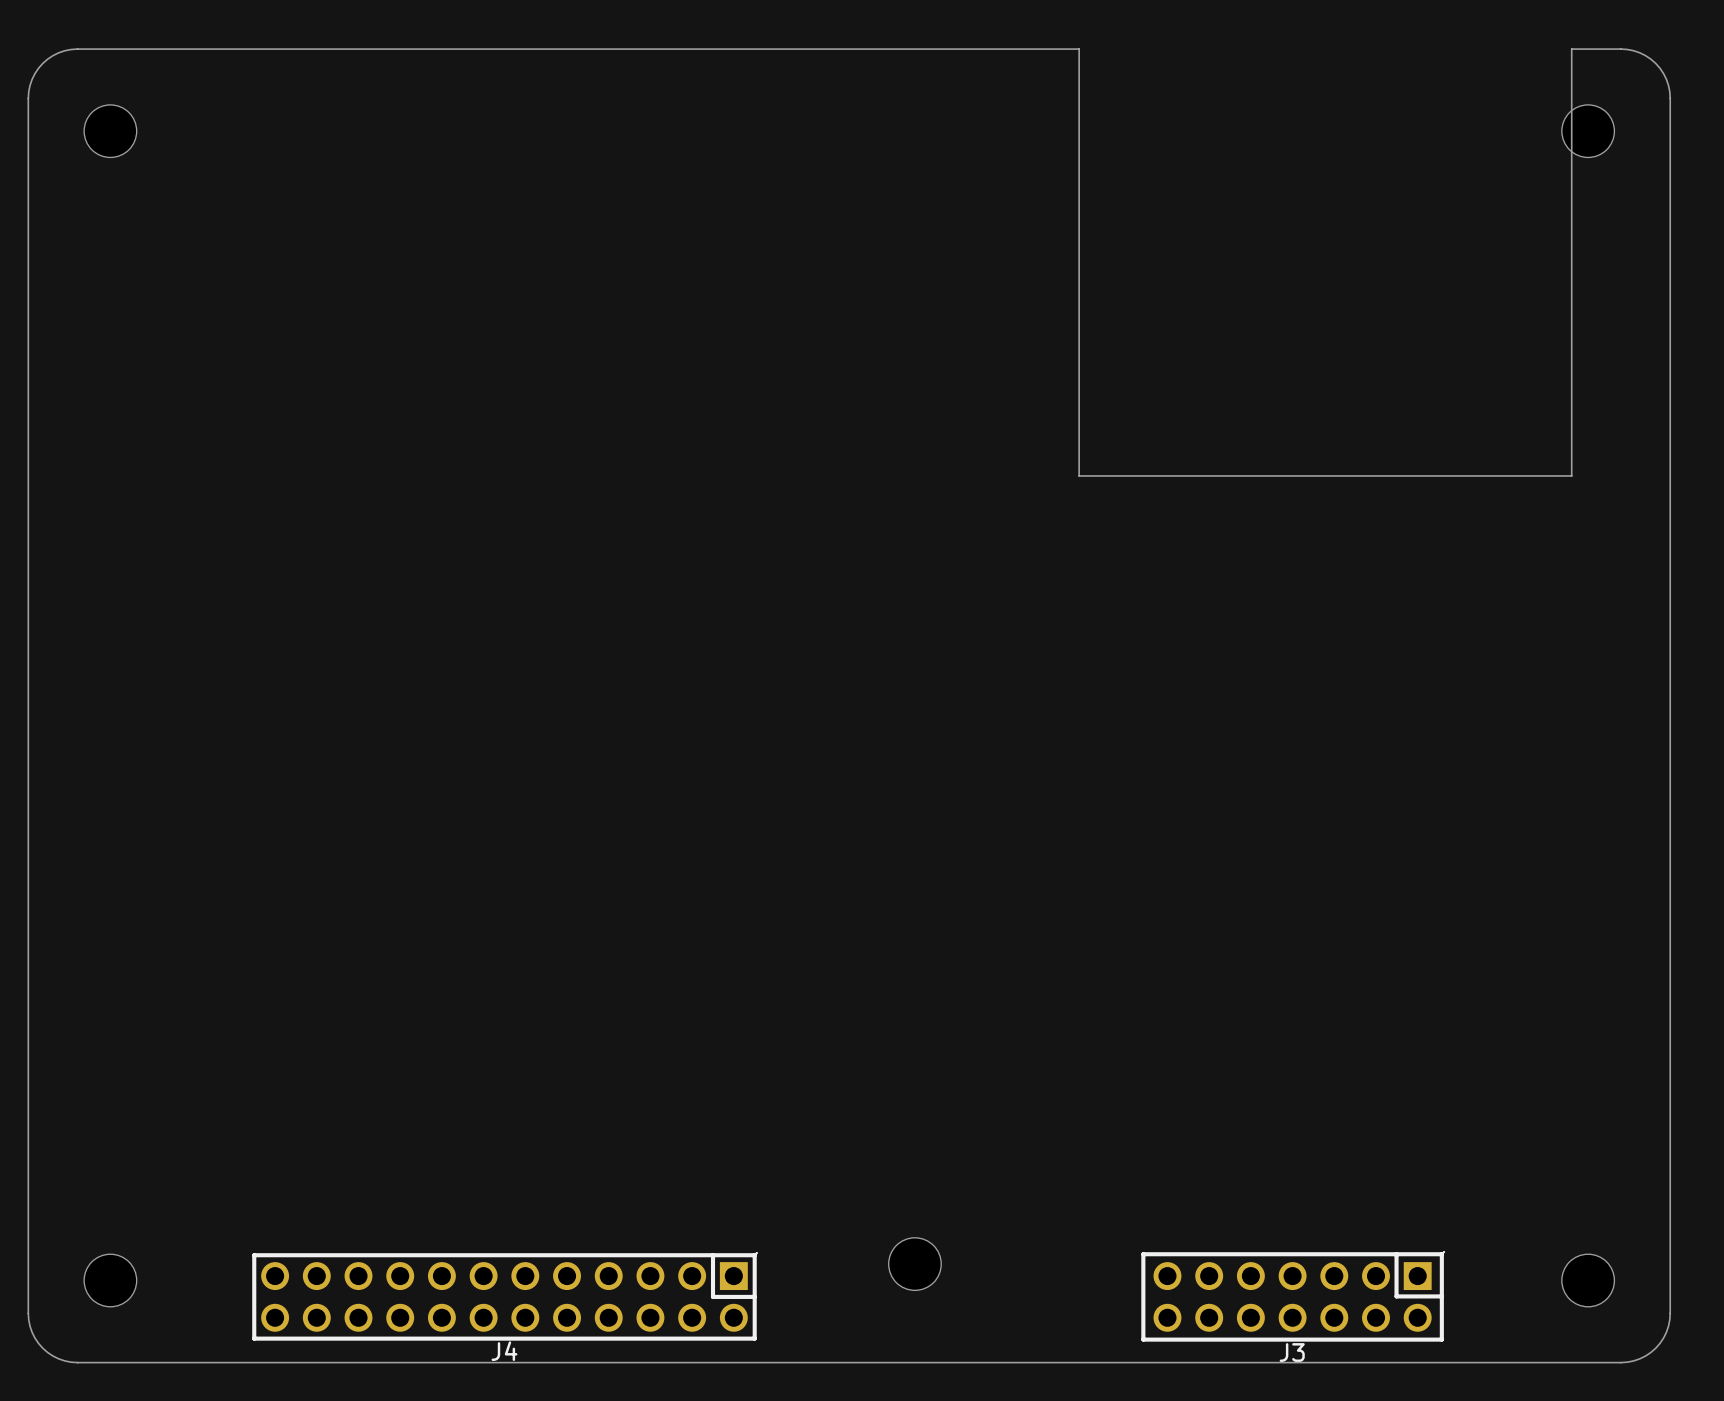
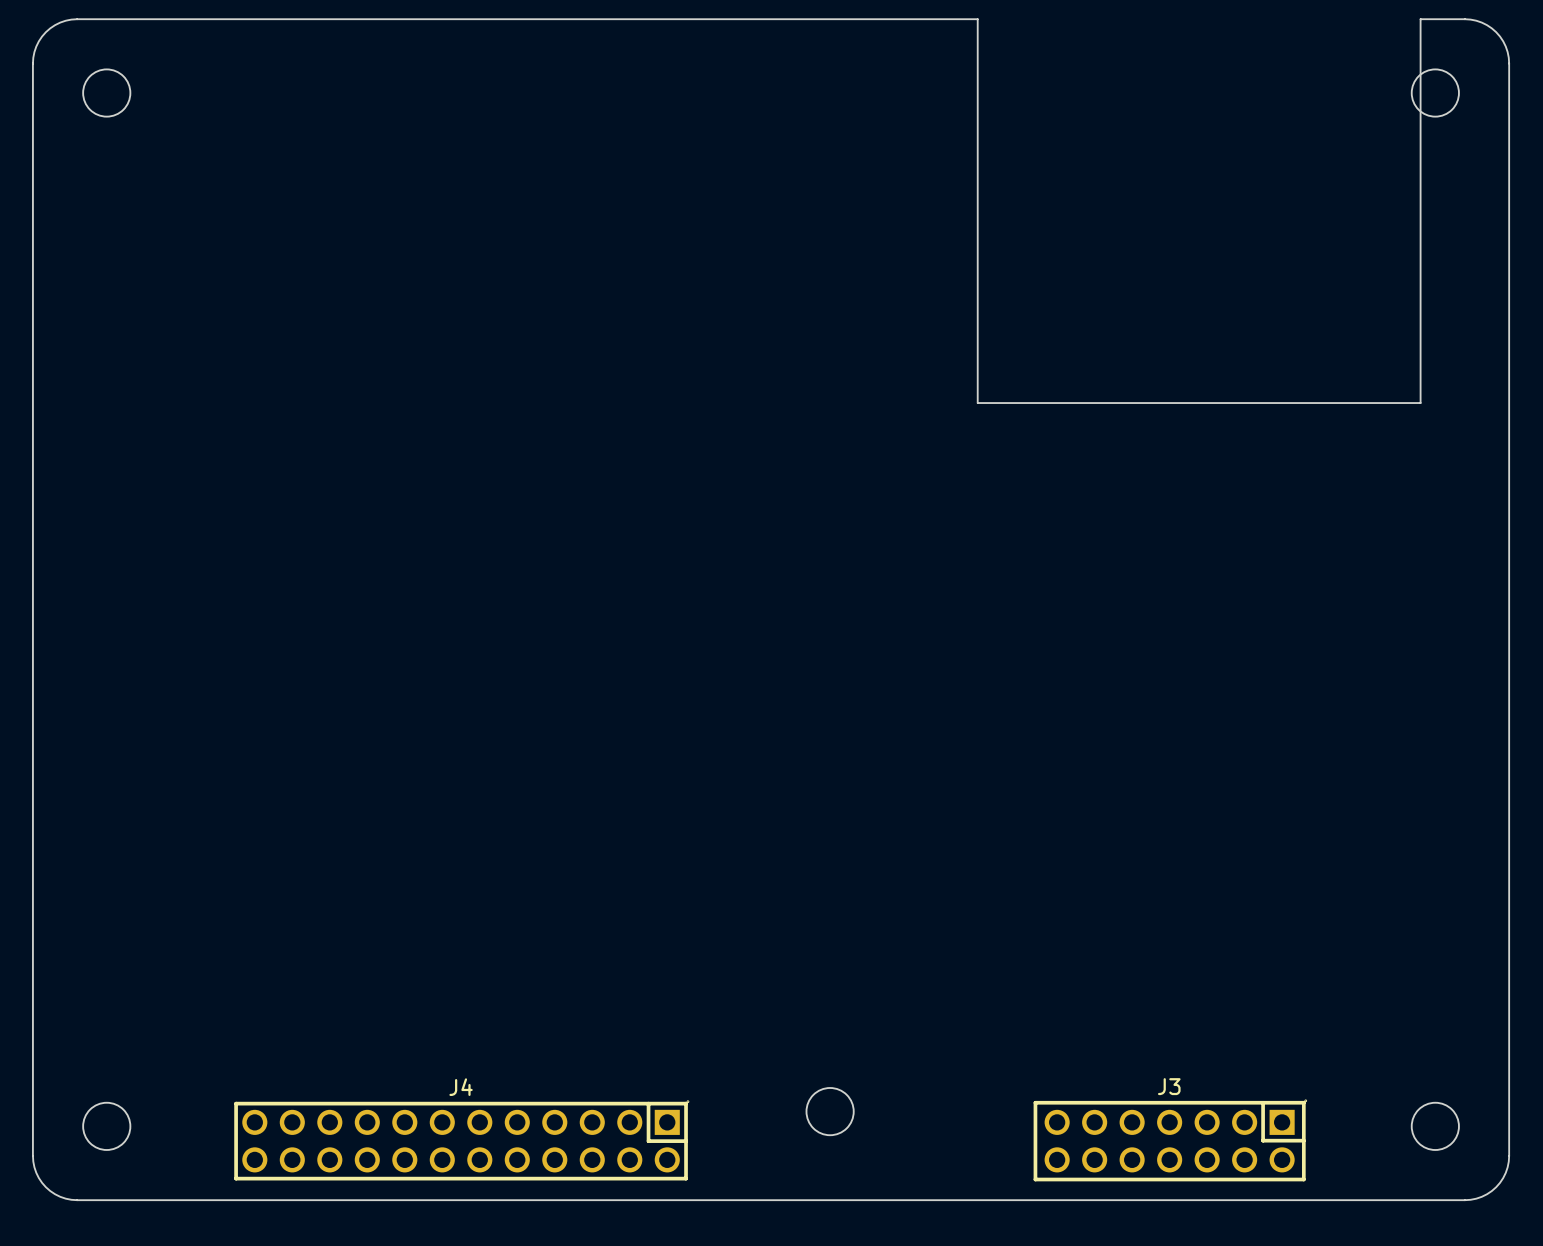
J4 name position: J4 (504, 1351) -> J4 (461, 1087)
J3 name position: J3 (1292, 1352) -> J3 (1169, 1086)

